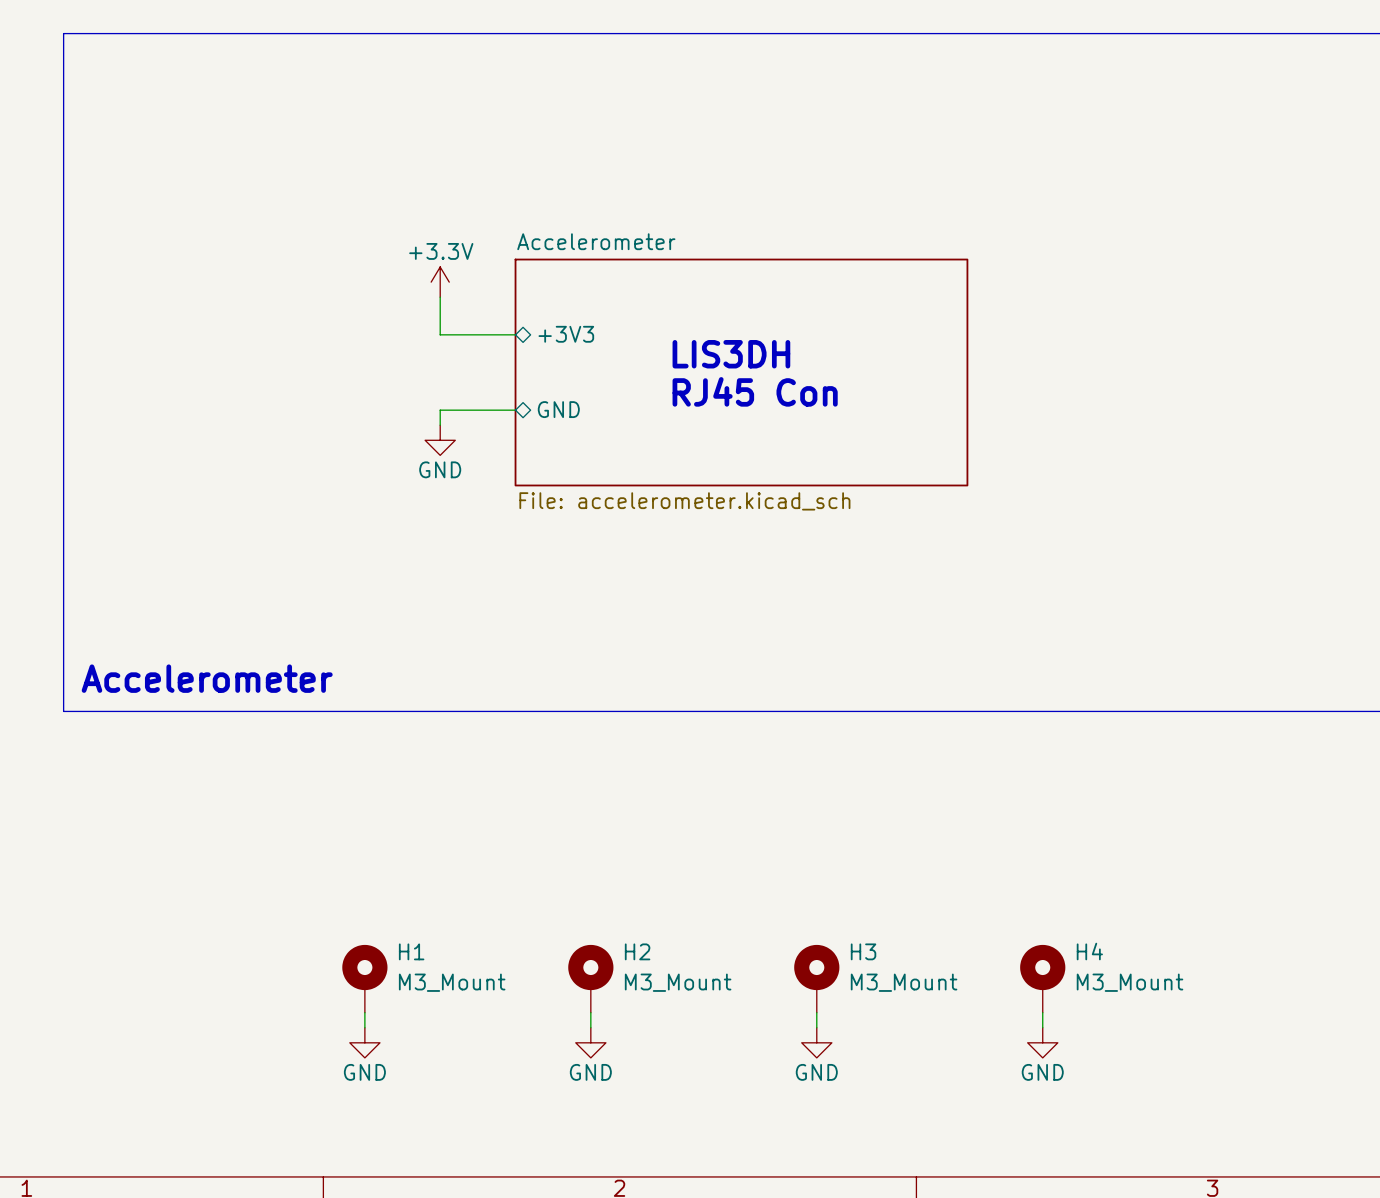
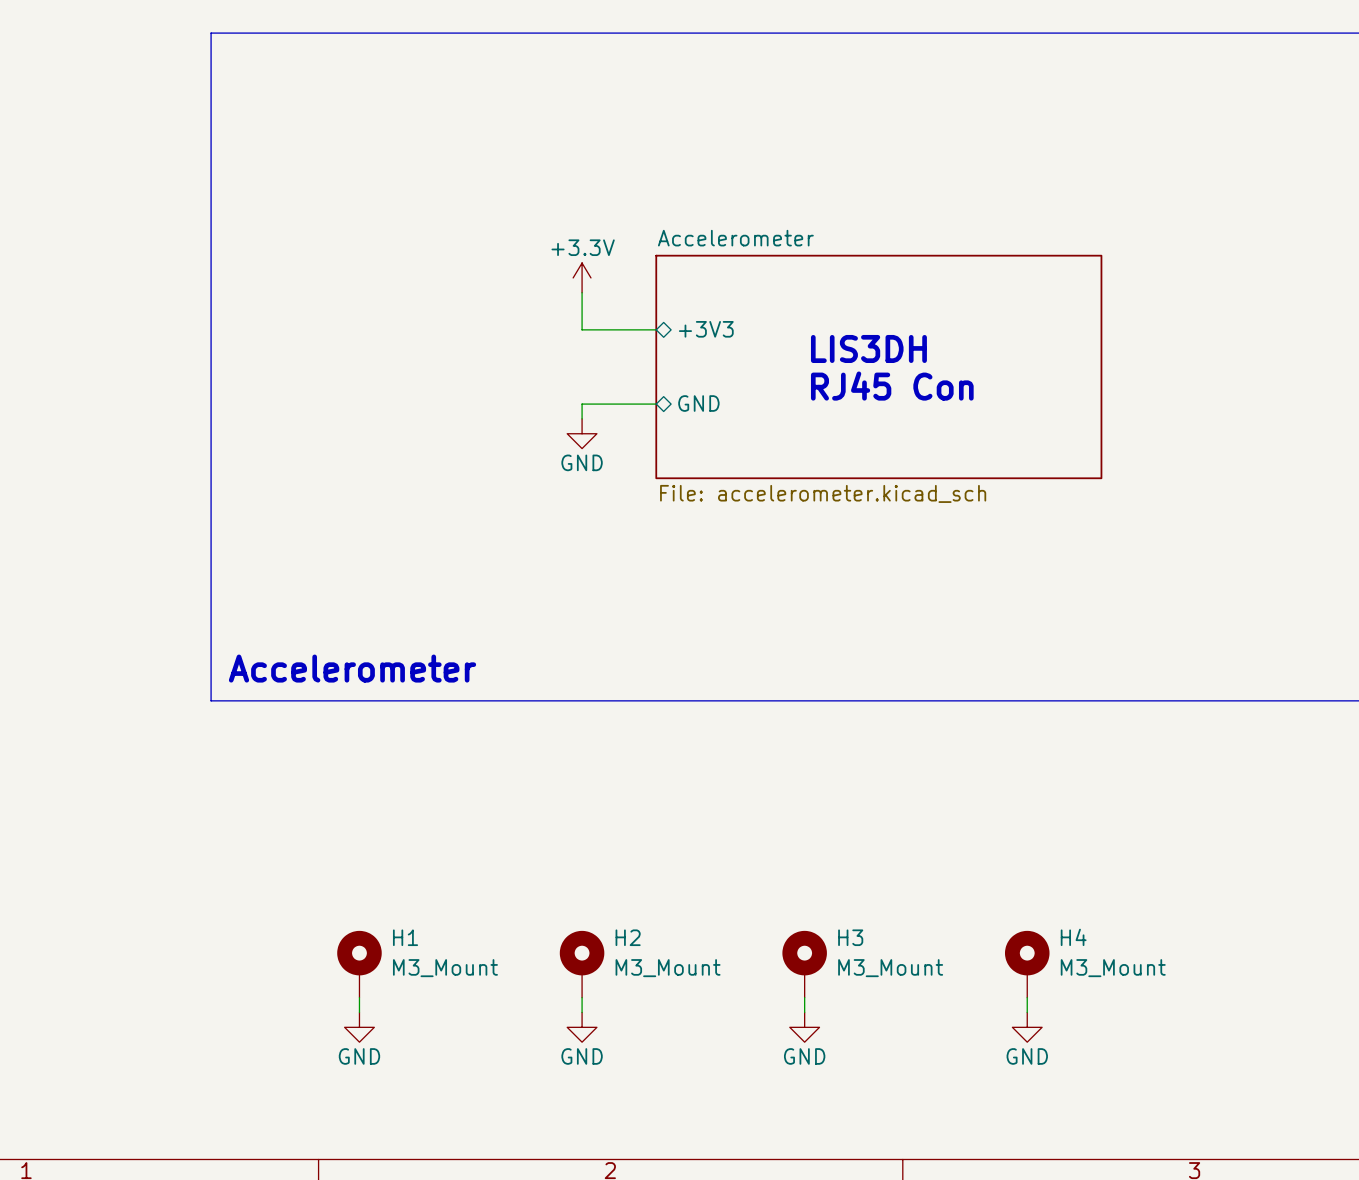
line: (214, 33) (63, 33) (63, 711) (214, 711) -> (211, 33) (211, 700)
power symbol position: +3.3V (440, 282) -> +3.3V (582, 277)
wire: (440, 297) (440, 334) (515, 334) -> (582, 292) (582, 329) (656, 329)
sheet pin position: +3V3 (566, 334) -> +3V3 (706, 329)
text position: LIS3DH (731, 354) -> LIS3DH (868, 348)
sheet Accelerometer position: (741, 372) -> (878, 366)
text position: RJ45 Con (755, 391) -> RJ45 Con (892, 386)
sheet pin position: GND (558, 409) -> GND (698, 403)
wire: (515, 410) (440, 410) (440, 425) -> (656, 404) (582, 404) (582, 418)
power symbol position: GND (440, 440) -> GND (582, 433)
text position: Accelerometer (207, 678) -> Accelerometer (352, 668)

